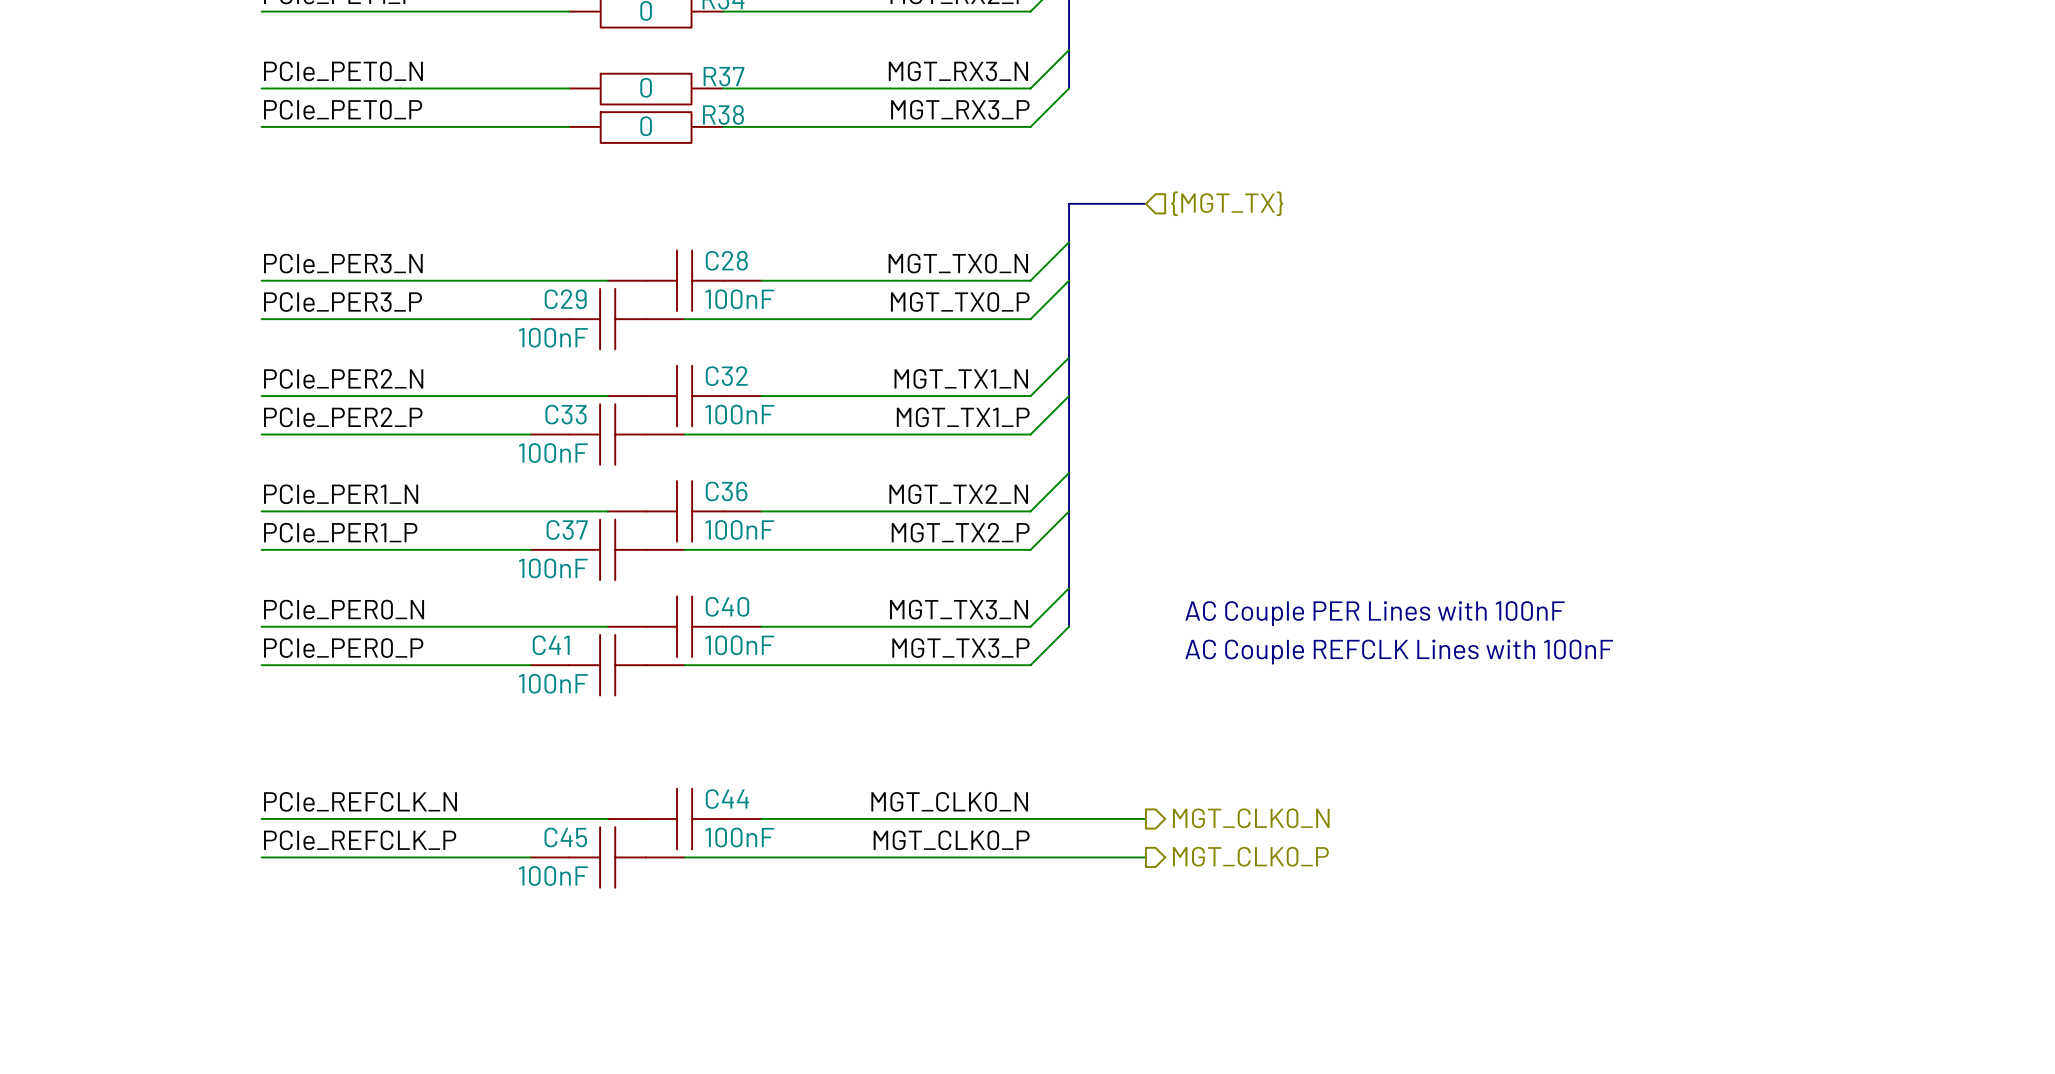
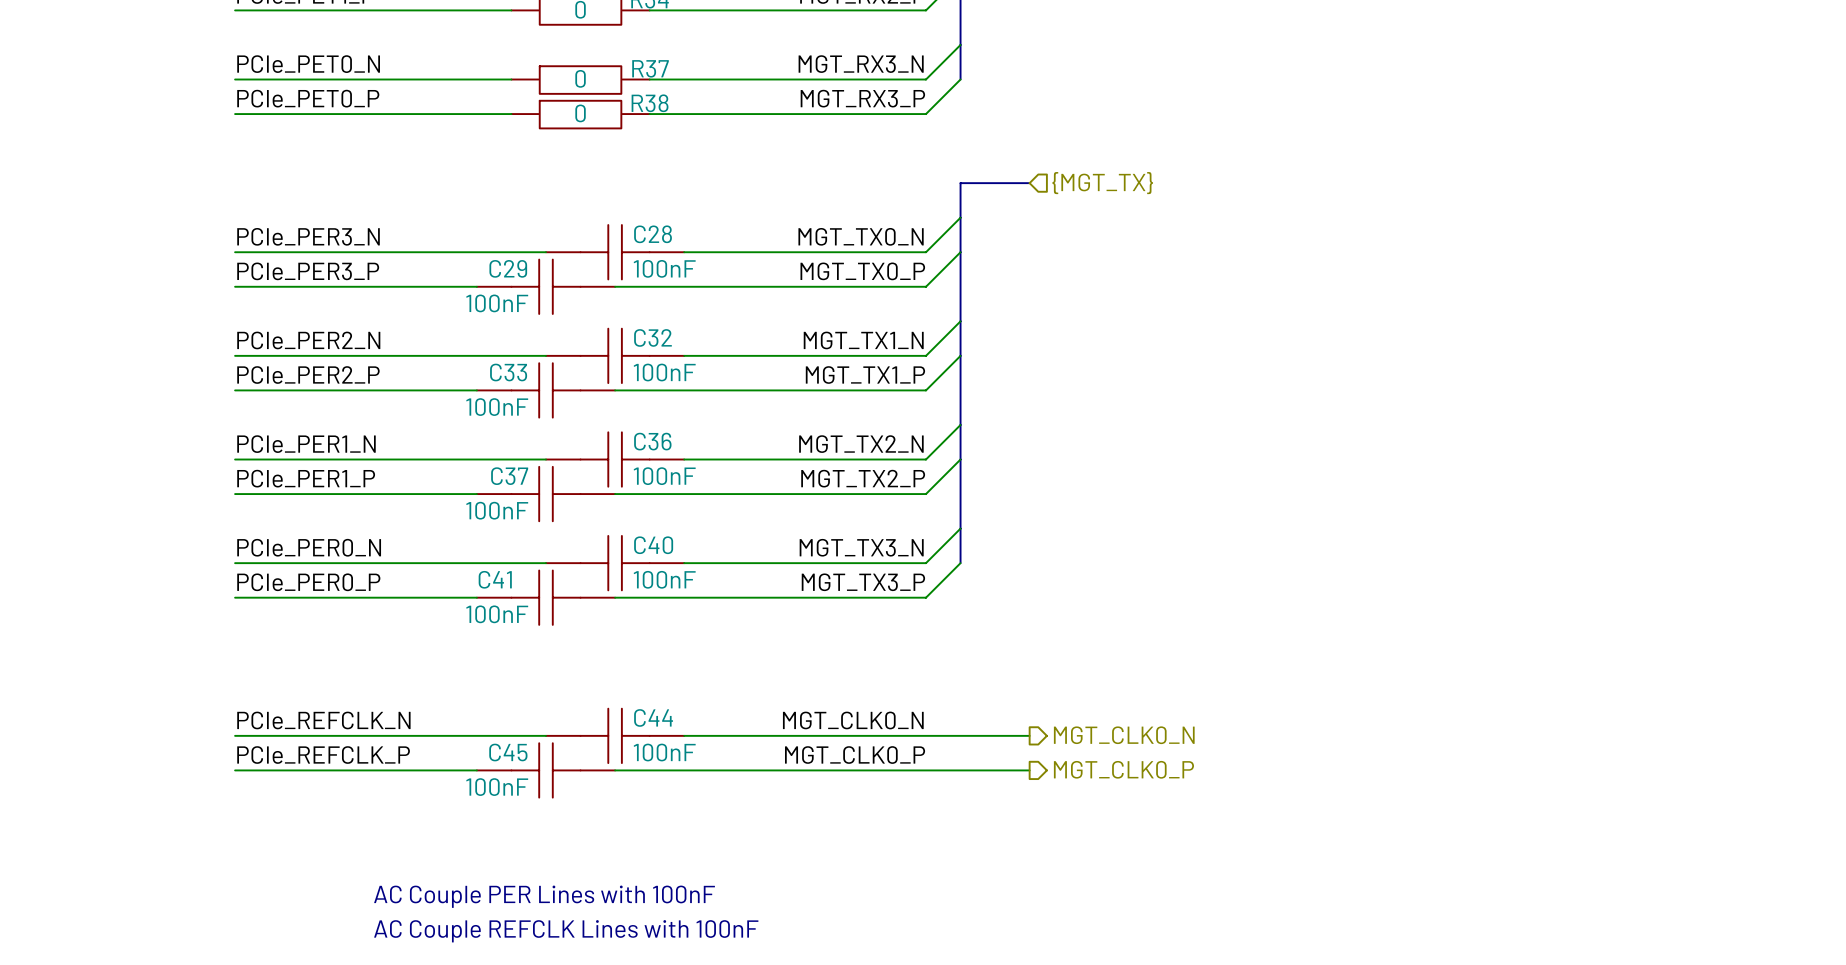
text: AC Couple PER Lines with 100nF (1374, 613) -> none
text: AC Couple REFCLK Lines with 100nF (1399, 651) -> none
text: none -> AC Couple PER Lines with 100nF (544, 896)
text: none -> AC Couple REFCLK Lines with 100nF (566, 931)

